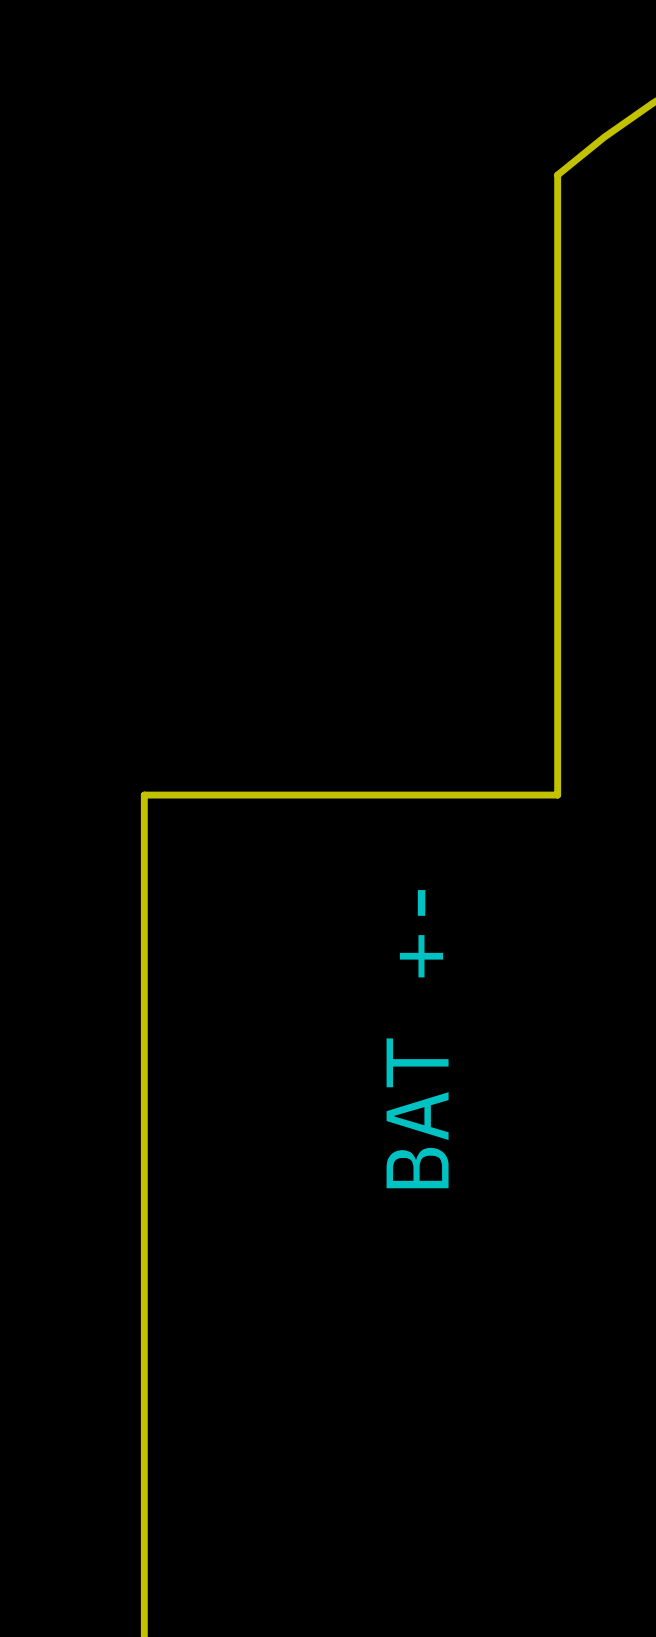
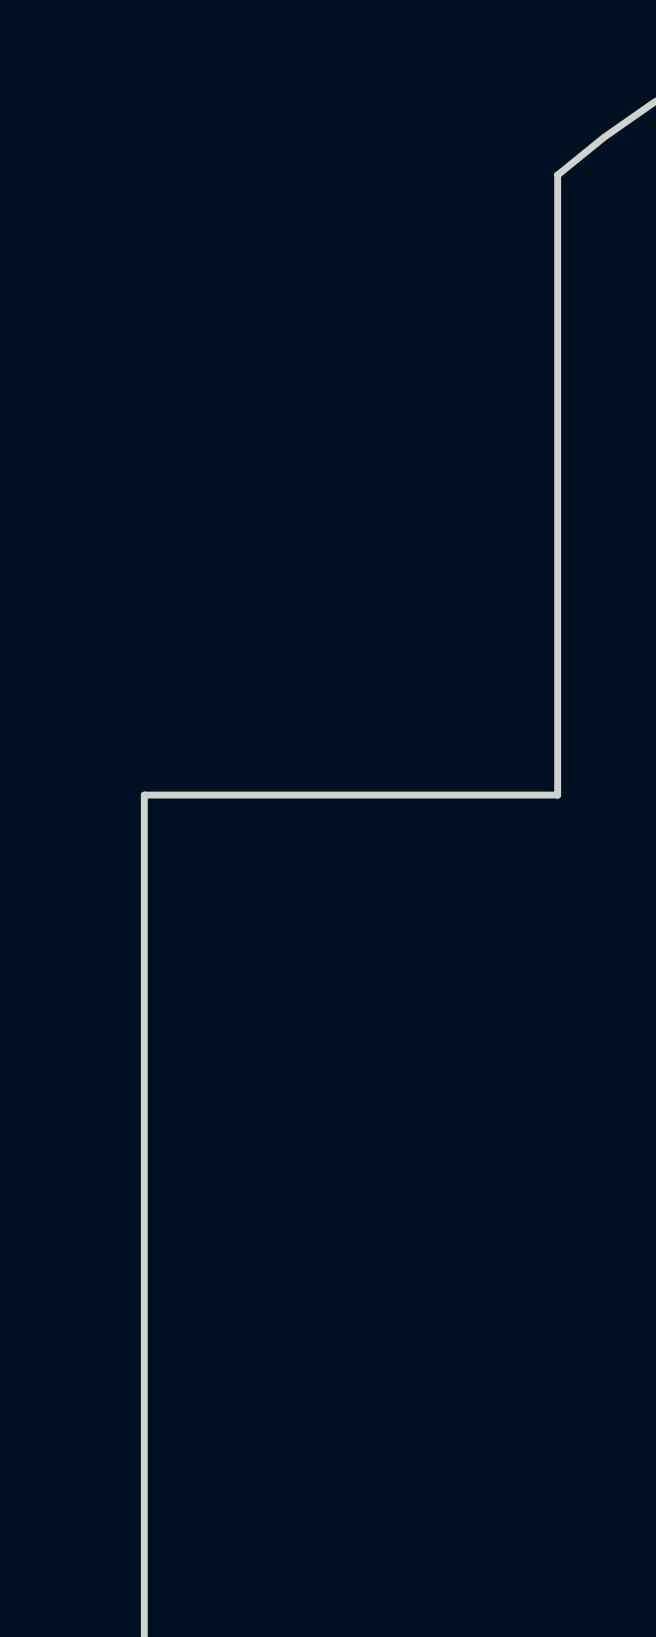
text: BAT +- (417, 1039) -> none

